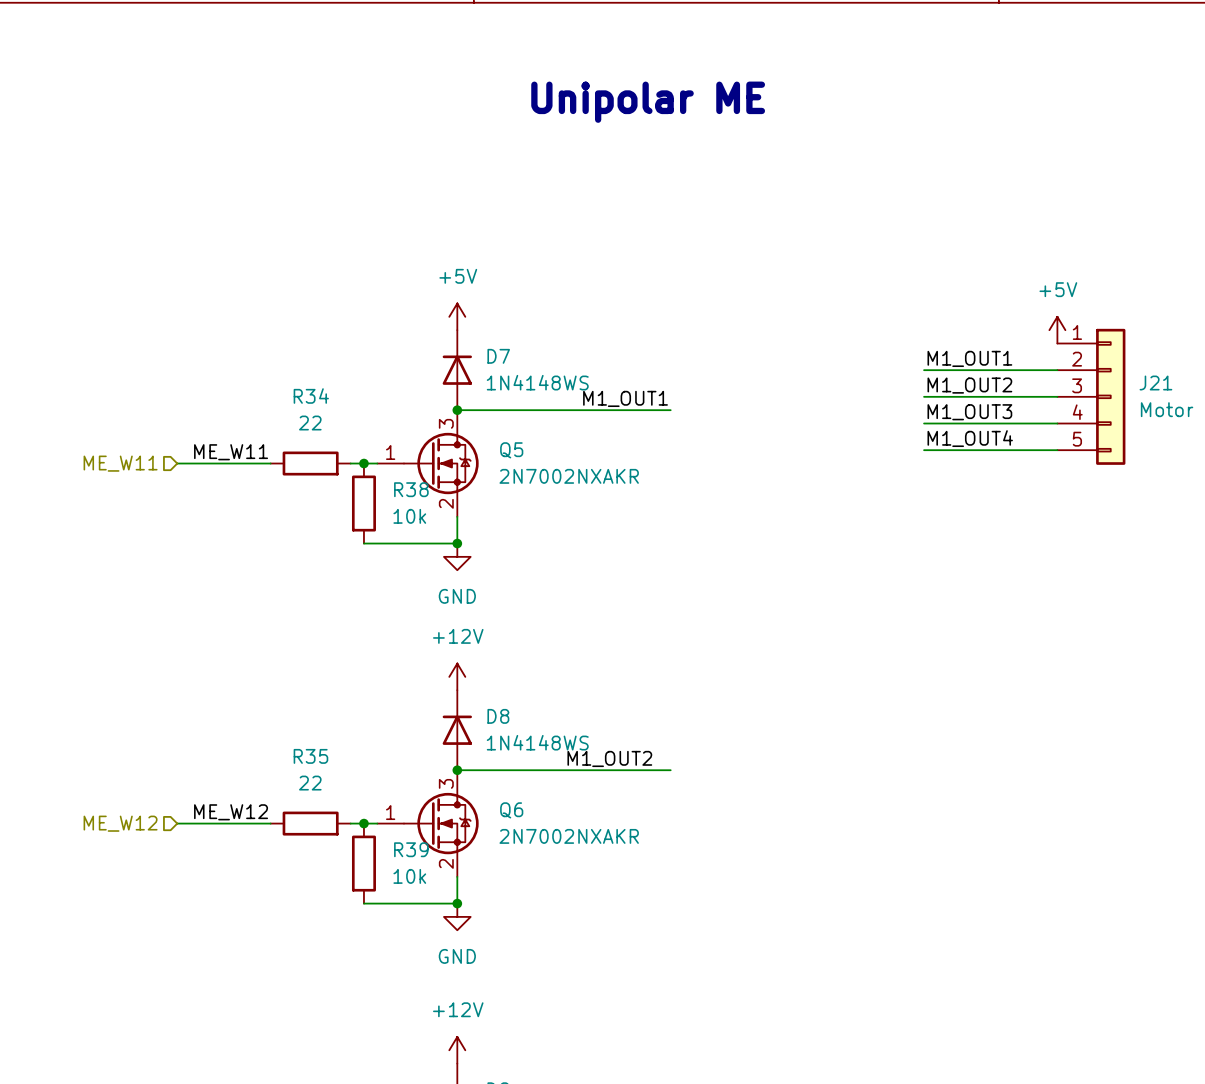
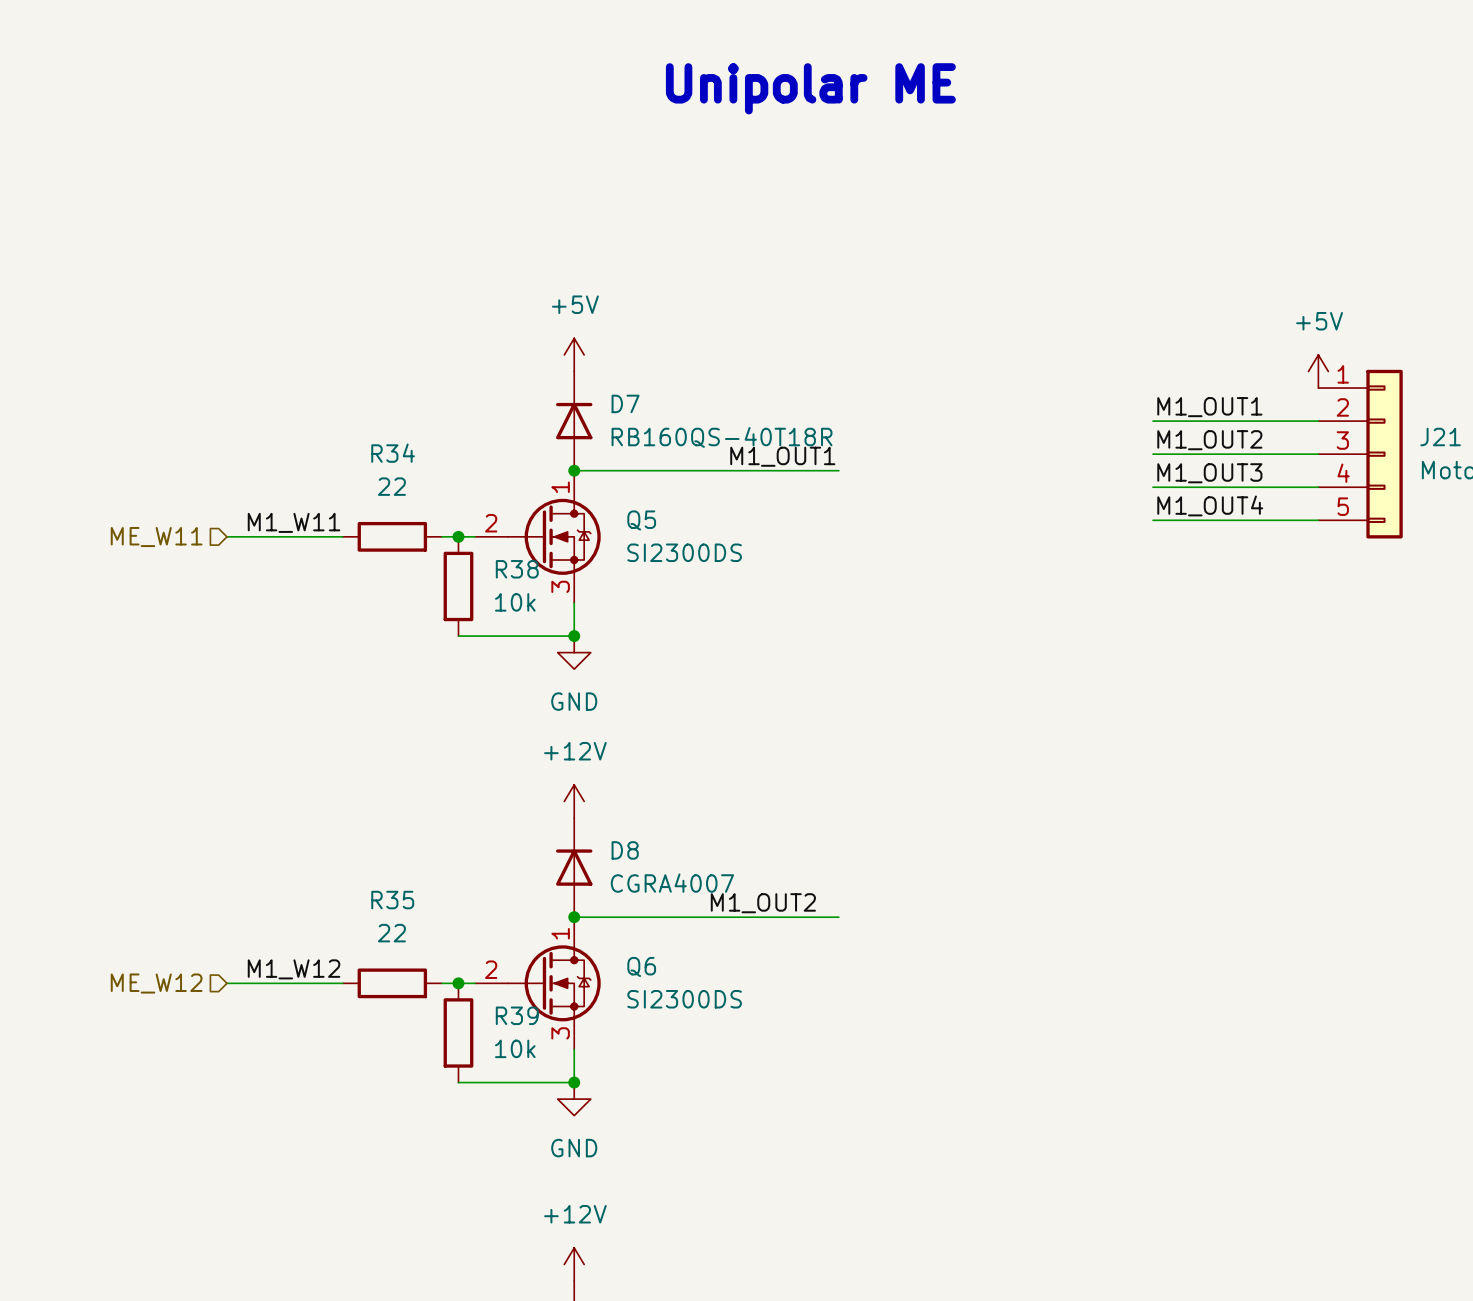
D7 value: 1N4148WS (537, 382) -> RB160QS-40T18R (722, 437)
Q5 pin number: 3 (446, 423) -> 1 (560, 487)
label: ME_W11 (231, 452) -> M1_W11 (294, 522)
Q5 pin number: 1 (390, 452) -> 2 (491, 523)
Q5 value: 2N7002NXAKR (569, 476) -> SI2300DS (684, 552)
Q5 pin number: 2 (446, 503) -> 3 (560, 586)
D8 value: 1N4148WS (537, 742) -> CGRA4007 (672, 883)
Q6 pin number: 3 (446, 783) -> 1 (560, 933)
label: ME_W12 (231, 812) -> M1_W12 (294, 969)
Q6 pin number: 1 (390, 812) -> 2 (491, 969)
Q6 value: 2N7002NXAKR (569, 836) -> SI2300DS (684, 999)
Q6 pin number: 2 (446, 863) -> 3 (560, 1033)

